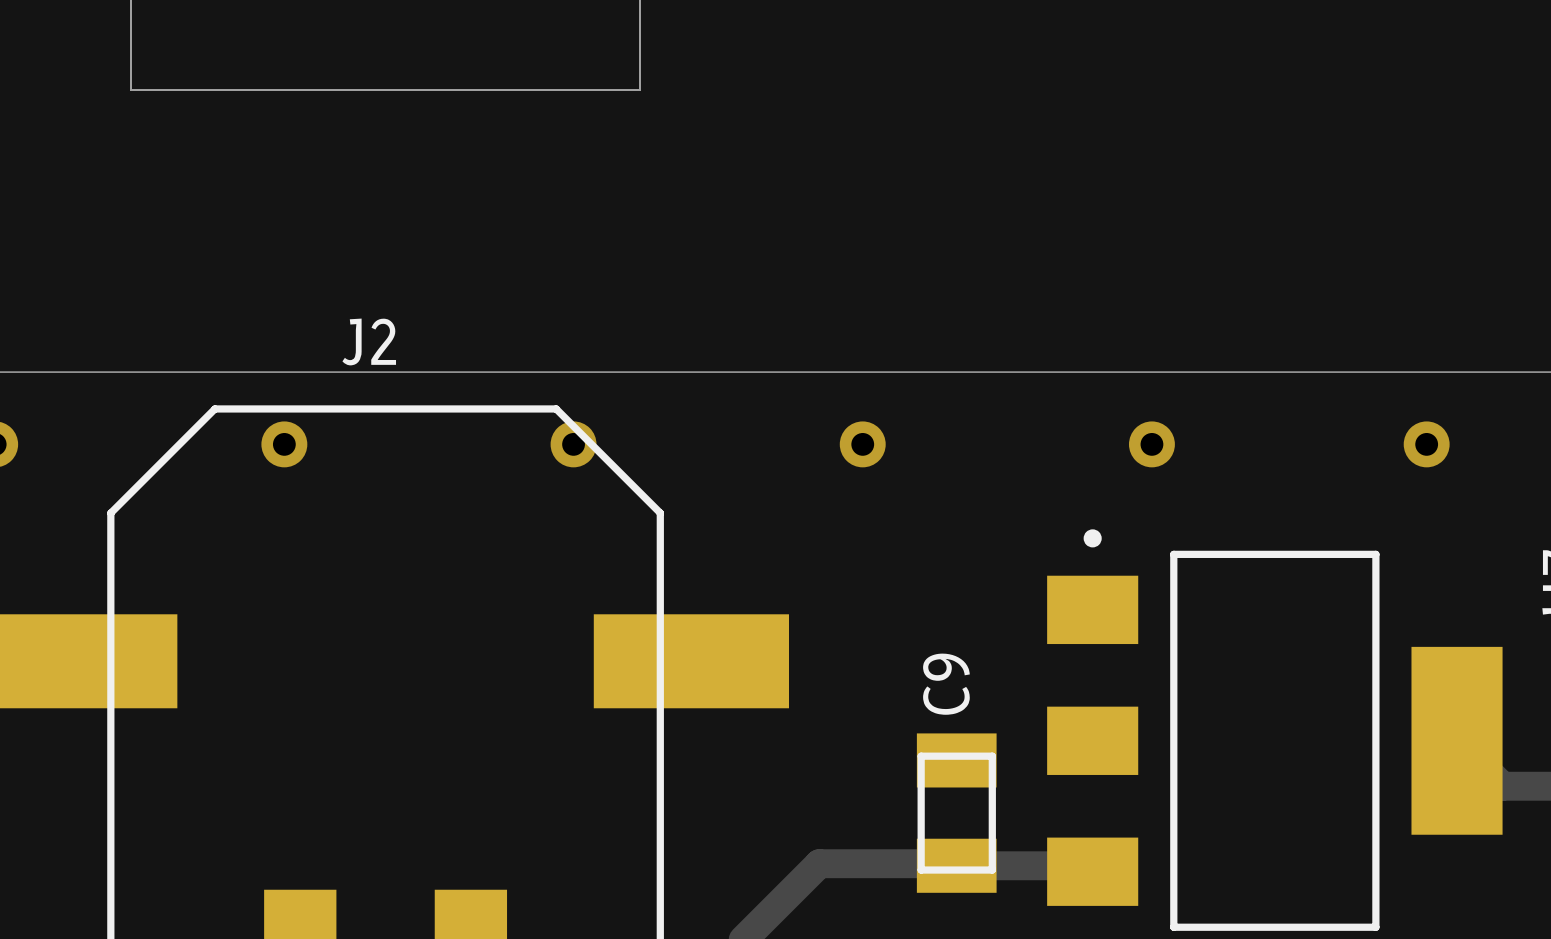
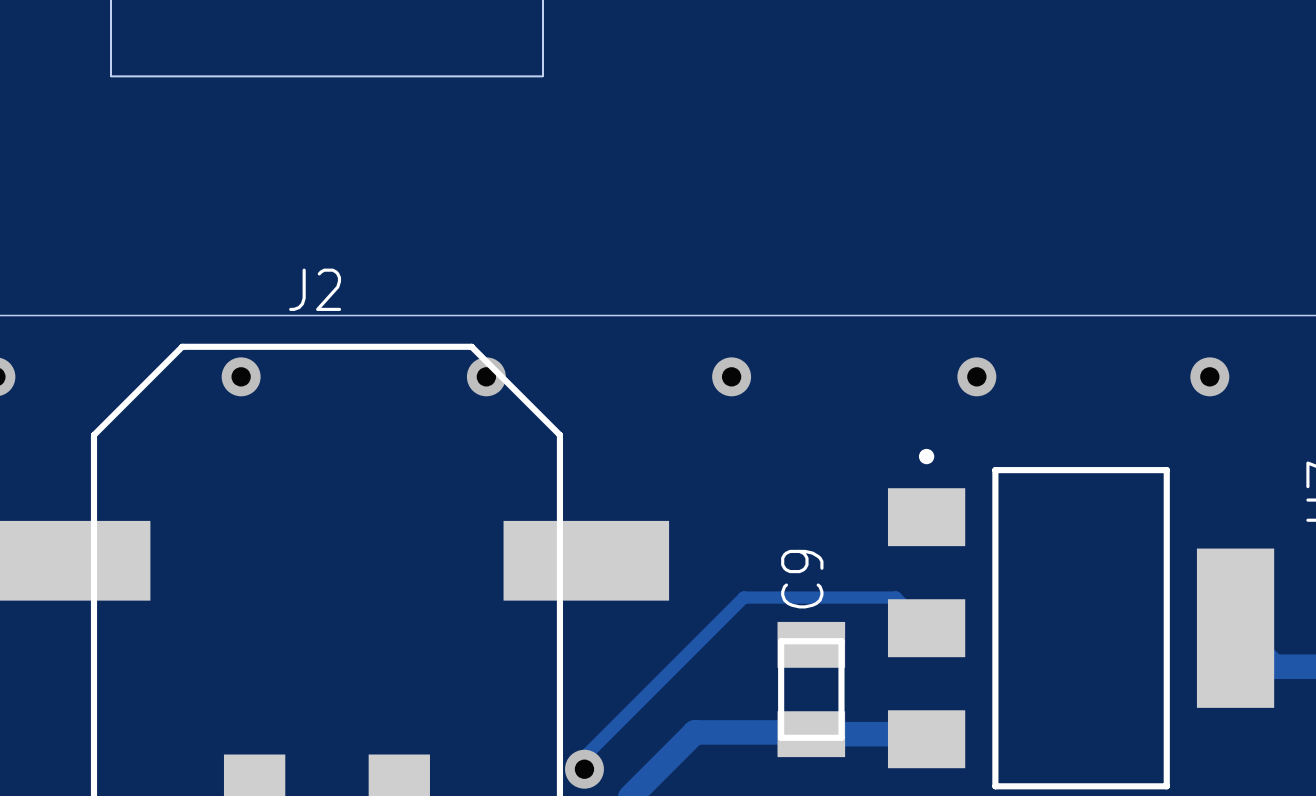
track: none -> (926, 628) (895, 597) (743, 597) (584, 756) (584, 769)
via: none -> (584, 769)

